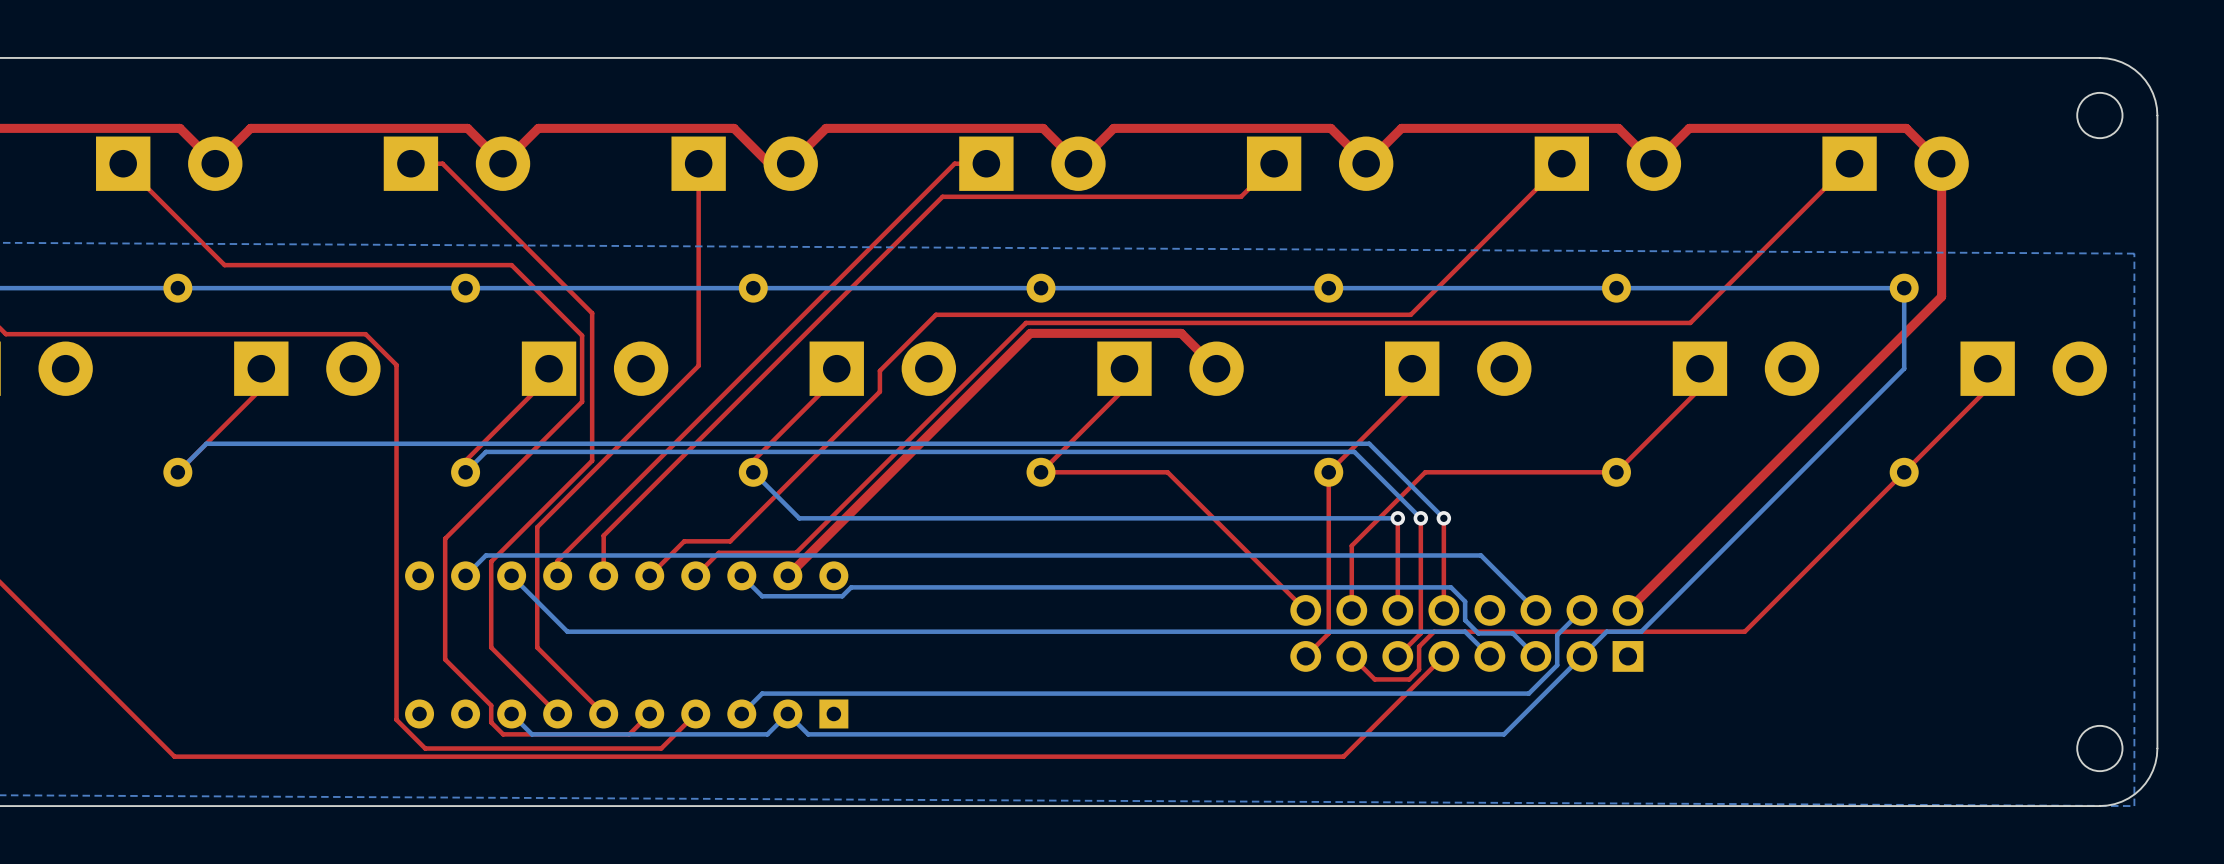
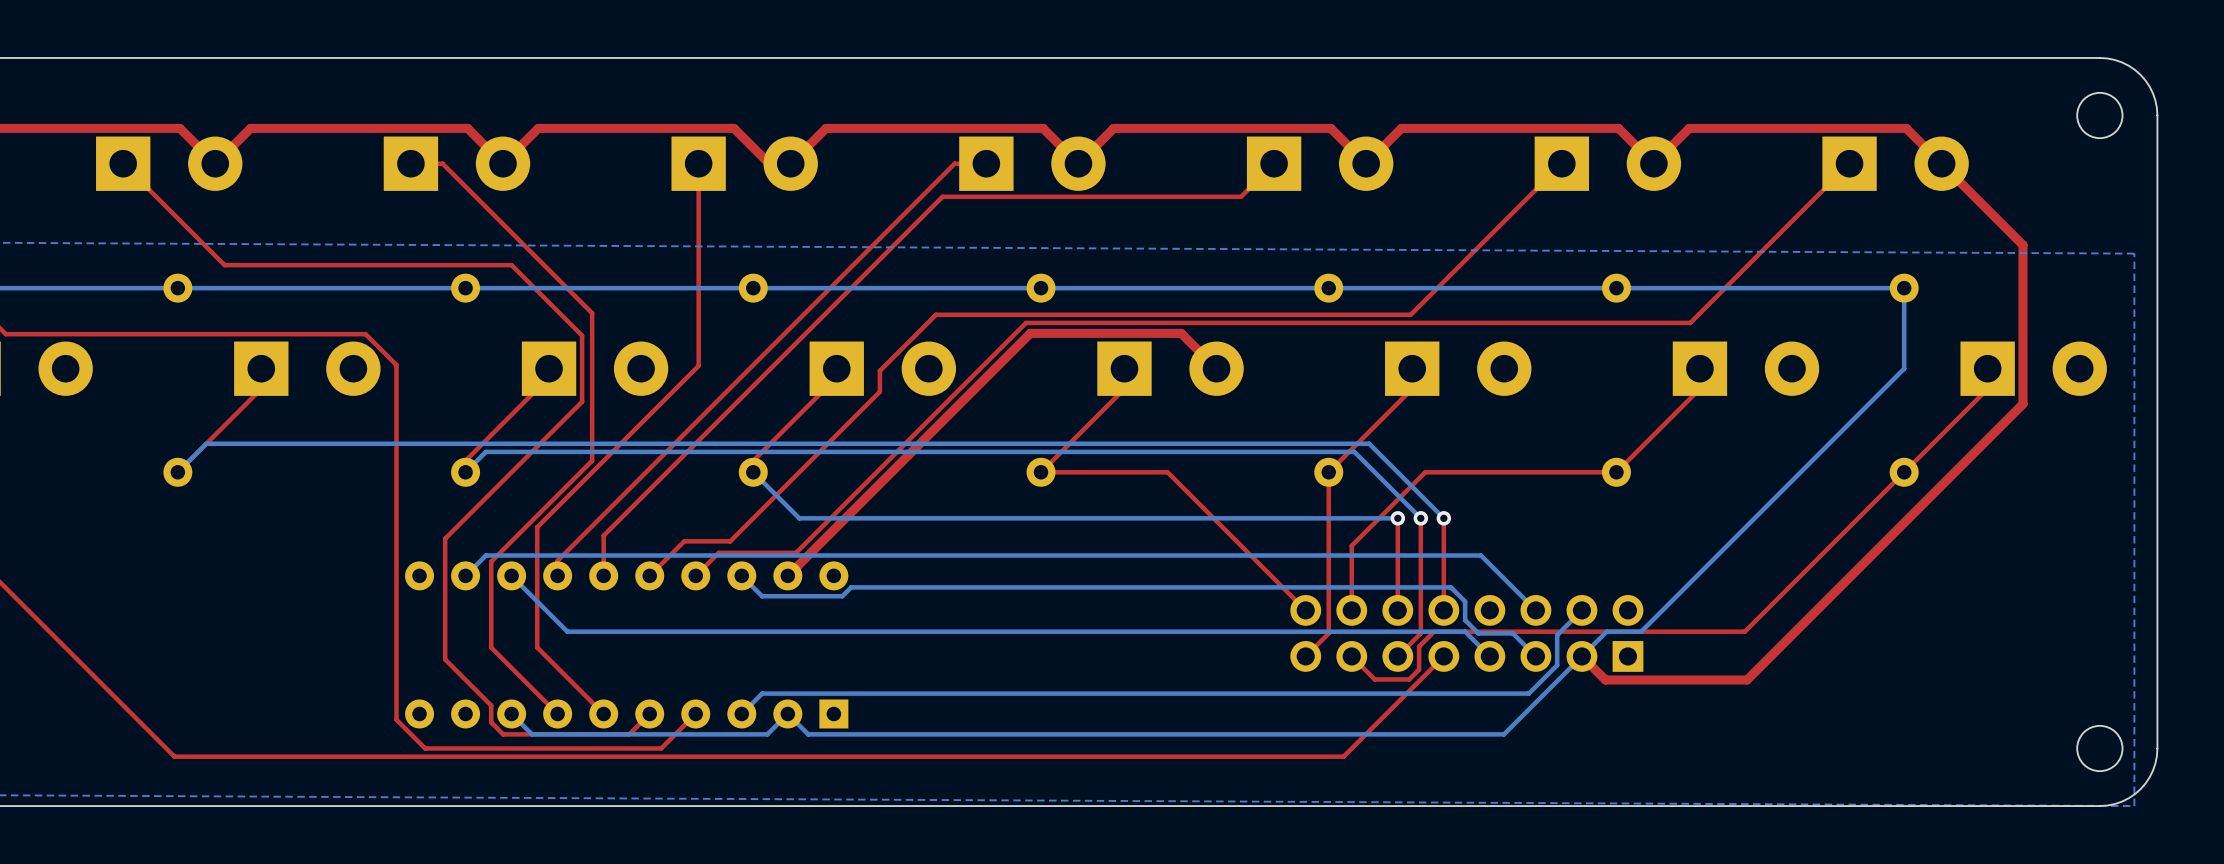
top track: (1941, 163) (1941, 296) (1627, 610) -> (1941, 163) (2023, 245) (2023, 404) (1747, 680) (1605, 680) (1581, 656)

